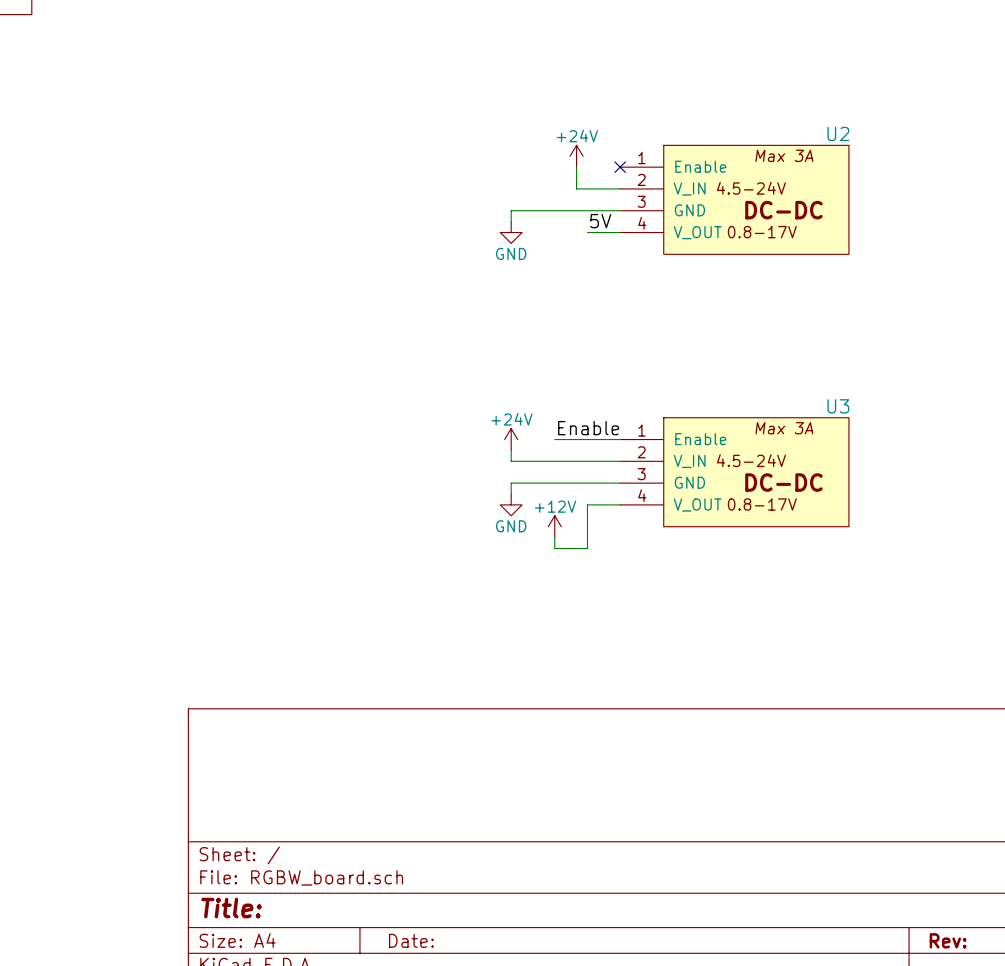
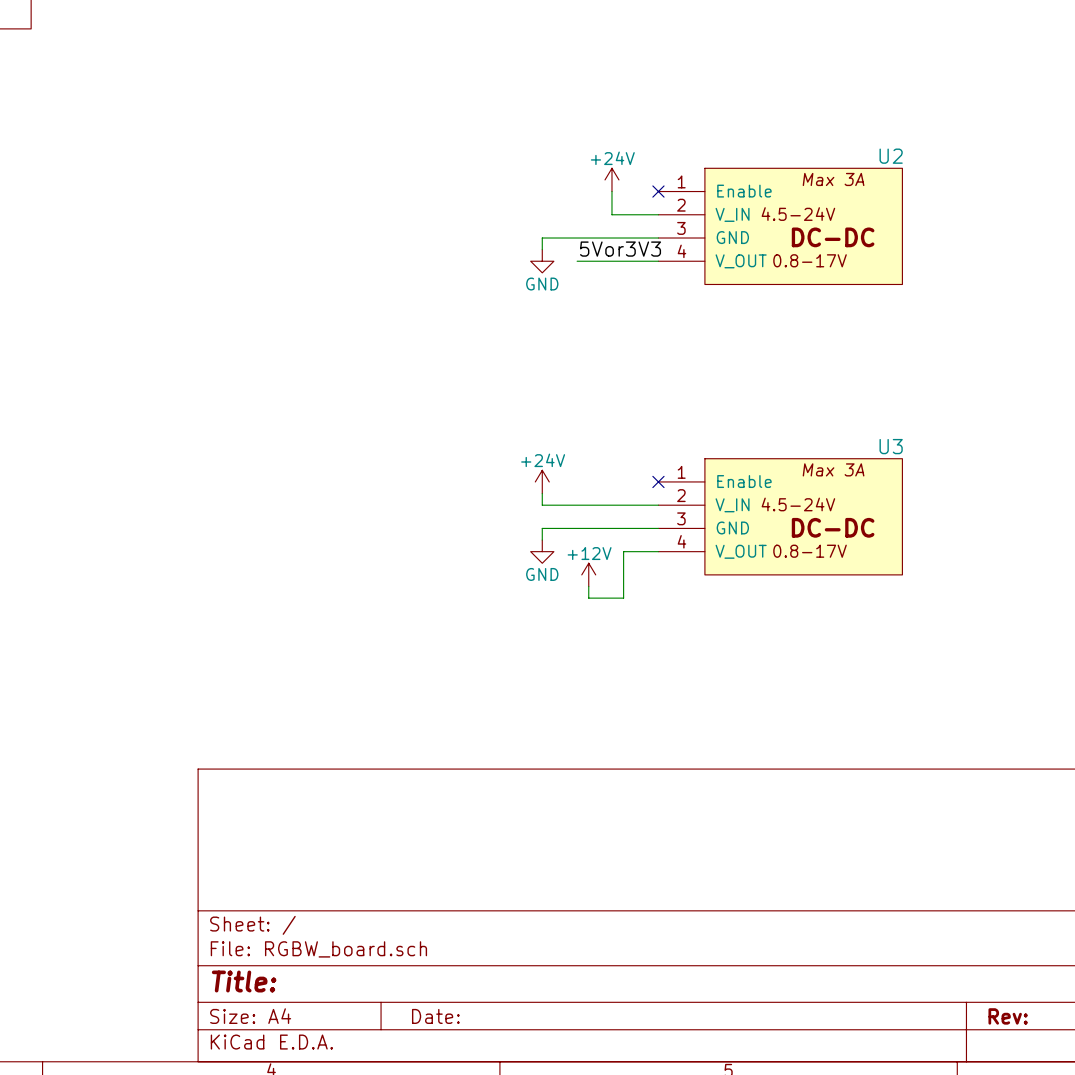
label: none -> 5Vor3V3 (620, 249)
label: 5V (600, 221) -> none
wire: none -> (577, 261) (623, 261)
label: Enable (588, 428) -> none
wire: (554, 439) (620, 439) -> none
no-connect mark: none -> (658, 481)

